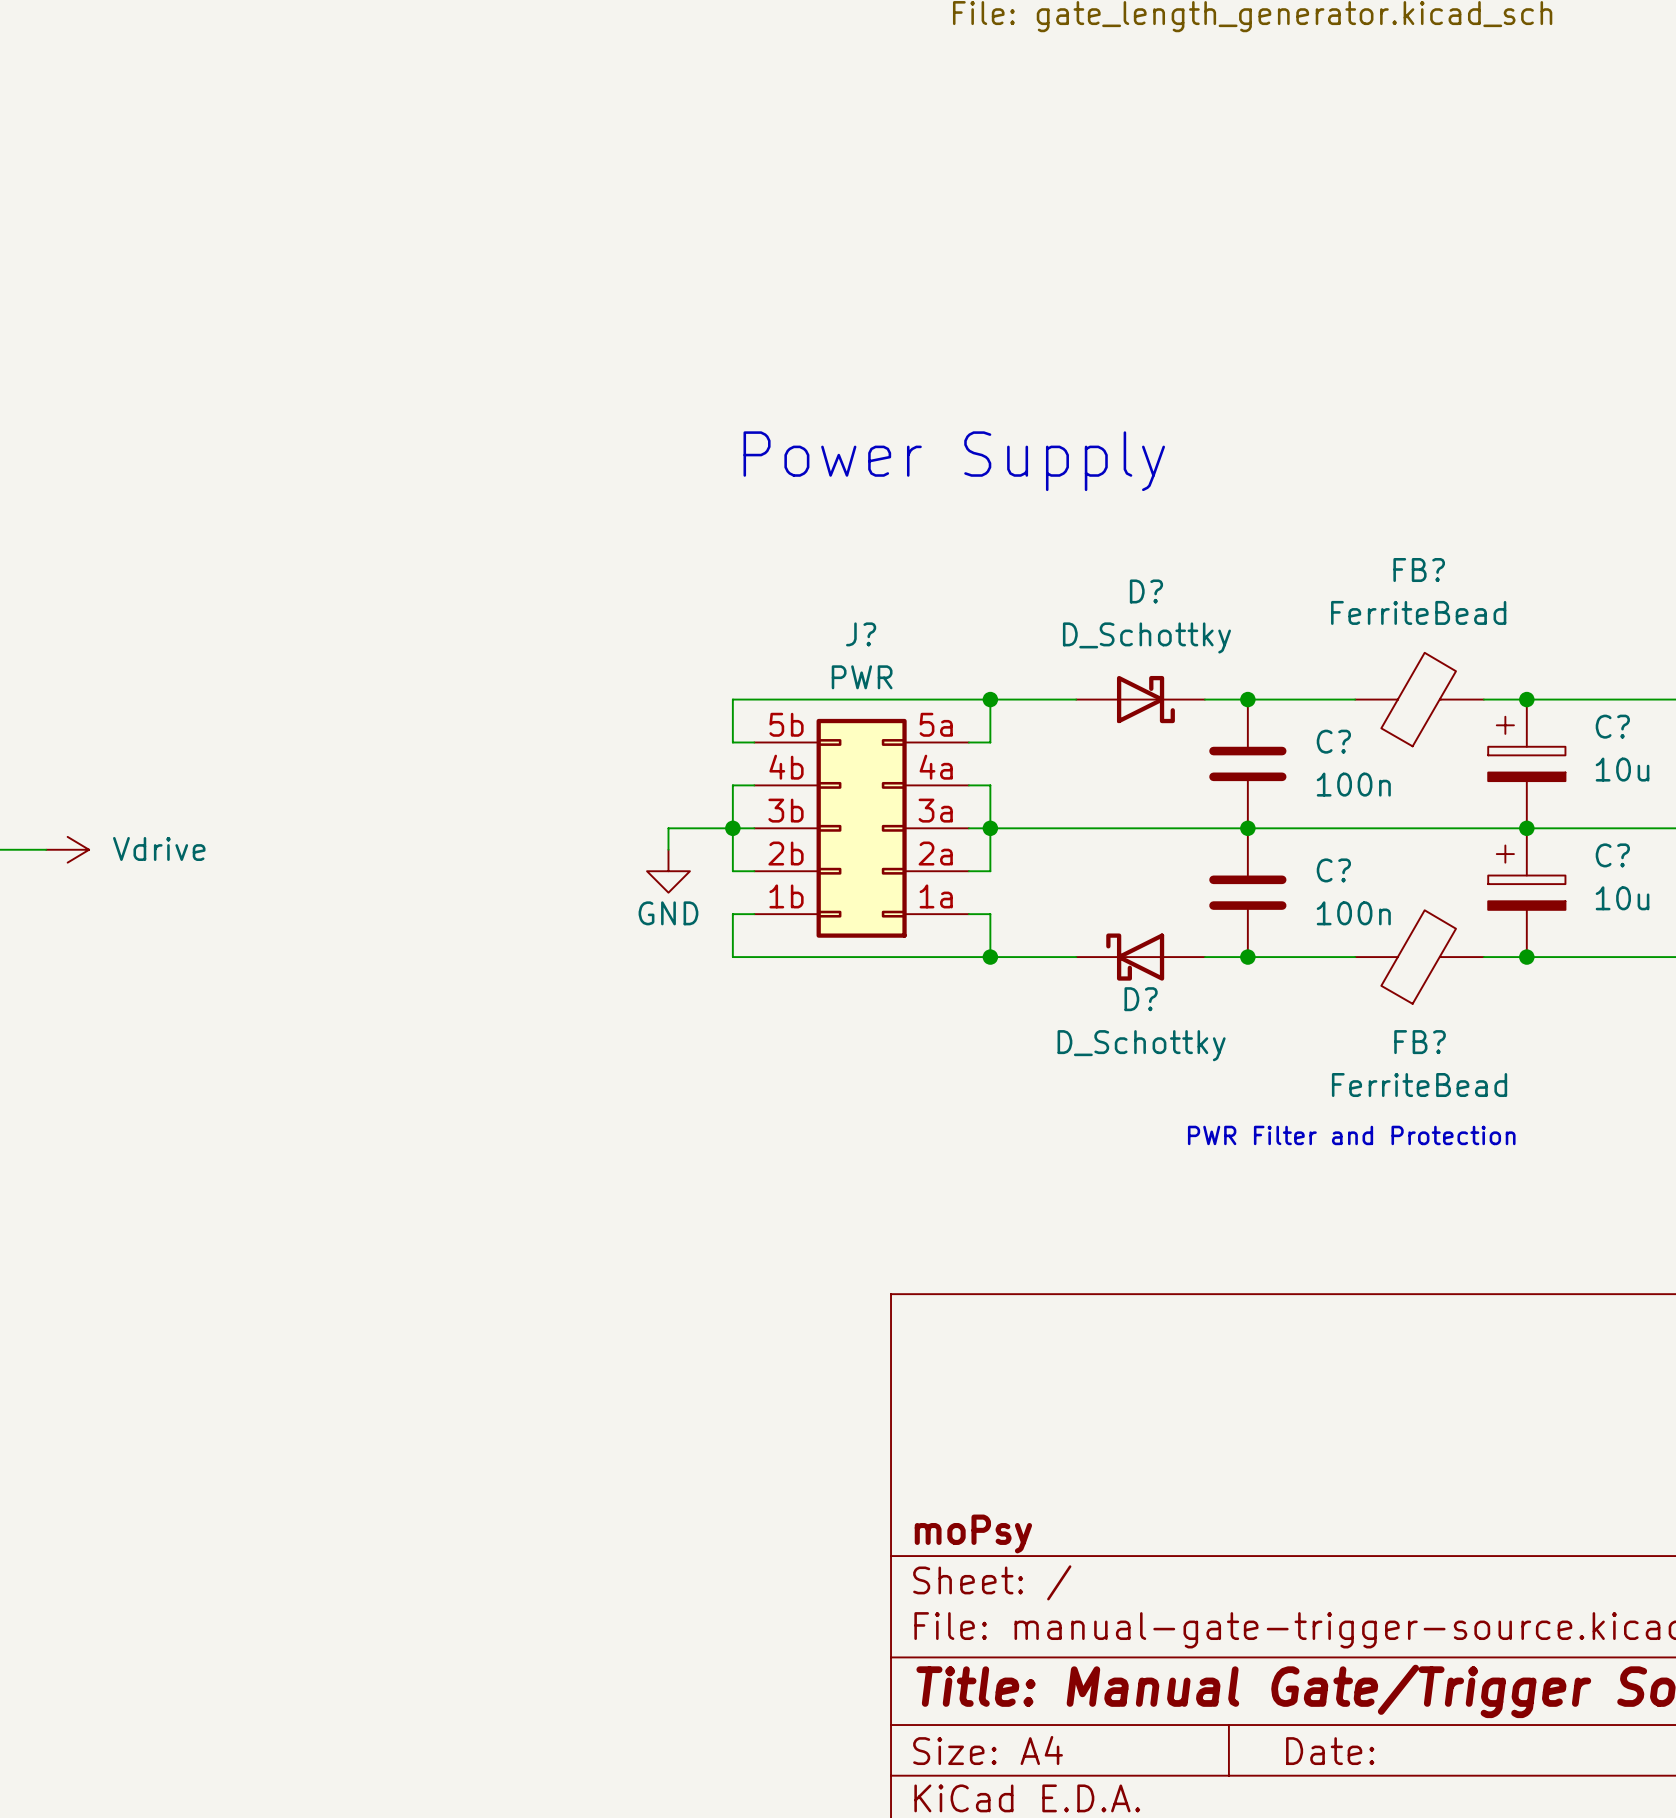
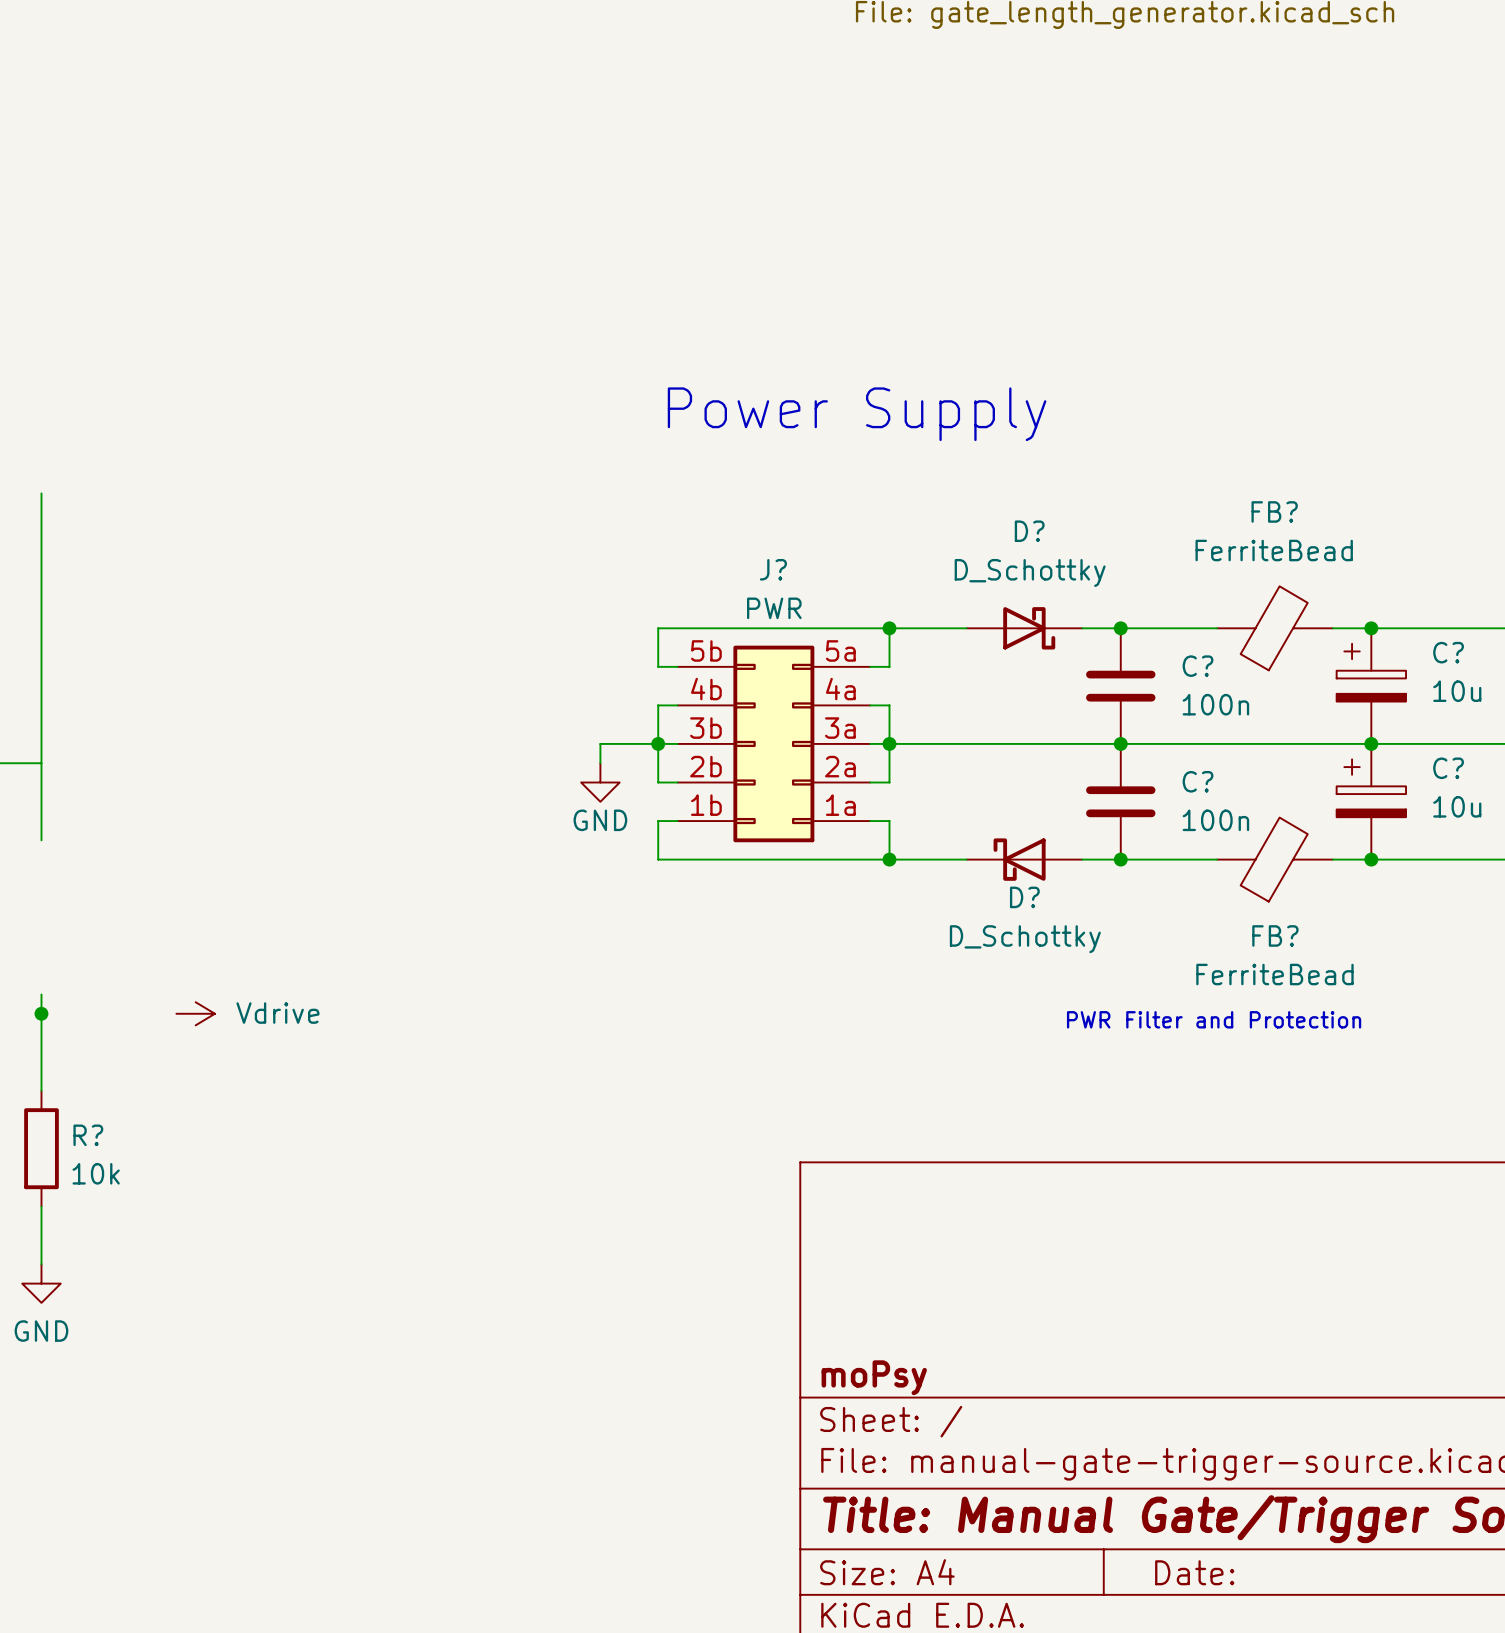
wire: none -> (41, 493) (41, 840)
power symbol position: Vdrive (67, 849) -> Vdrive (195, 1013)
wire: none -> (41, 994) (41, 1090)
junction: none -> (41, 1013)
R?: none -> 10k (41, 1148)
wire: none -> (41, 1206) (41, 1264)
power symbol: none -> GND (41, 1283)

